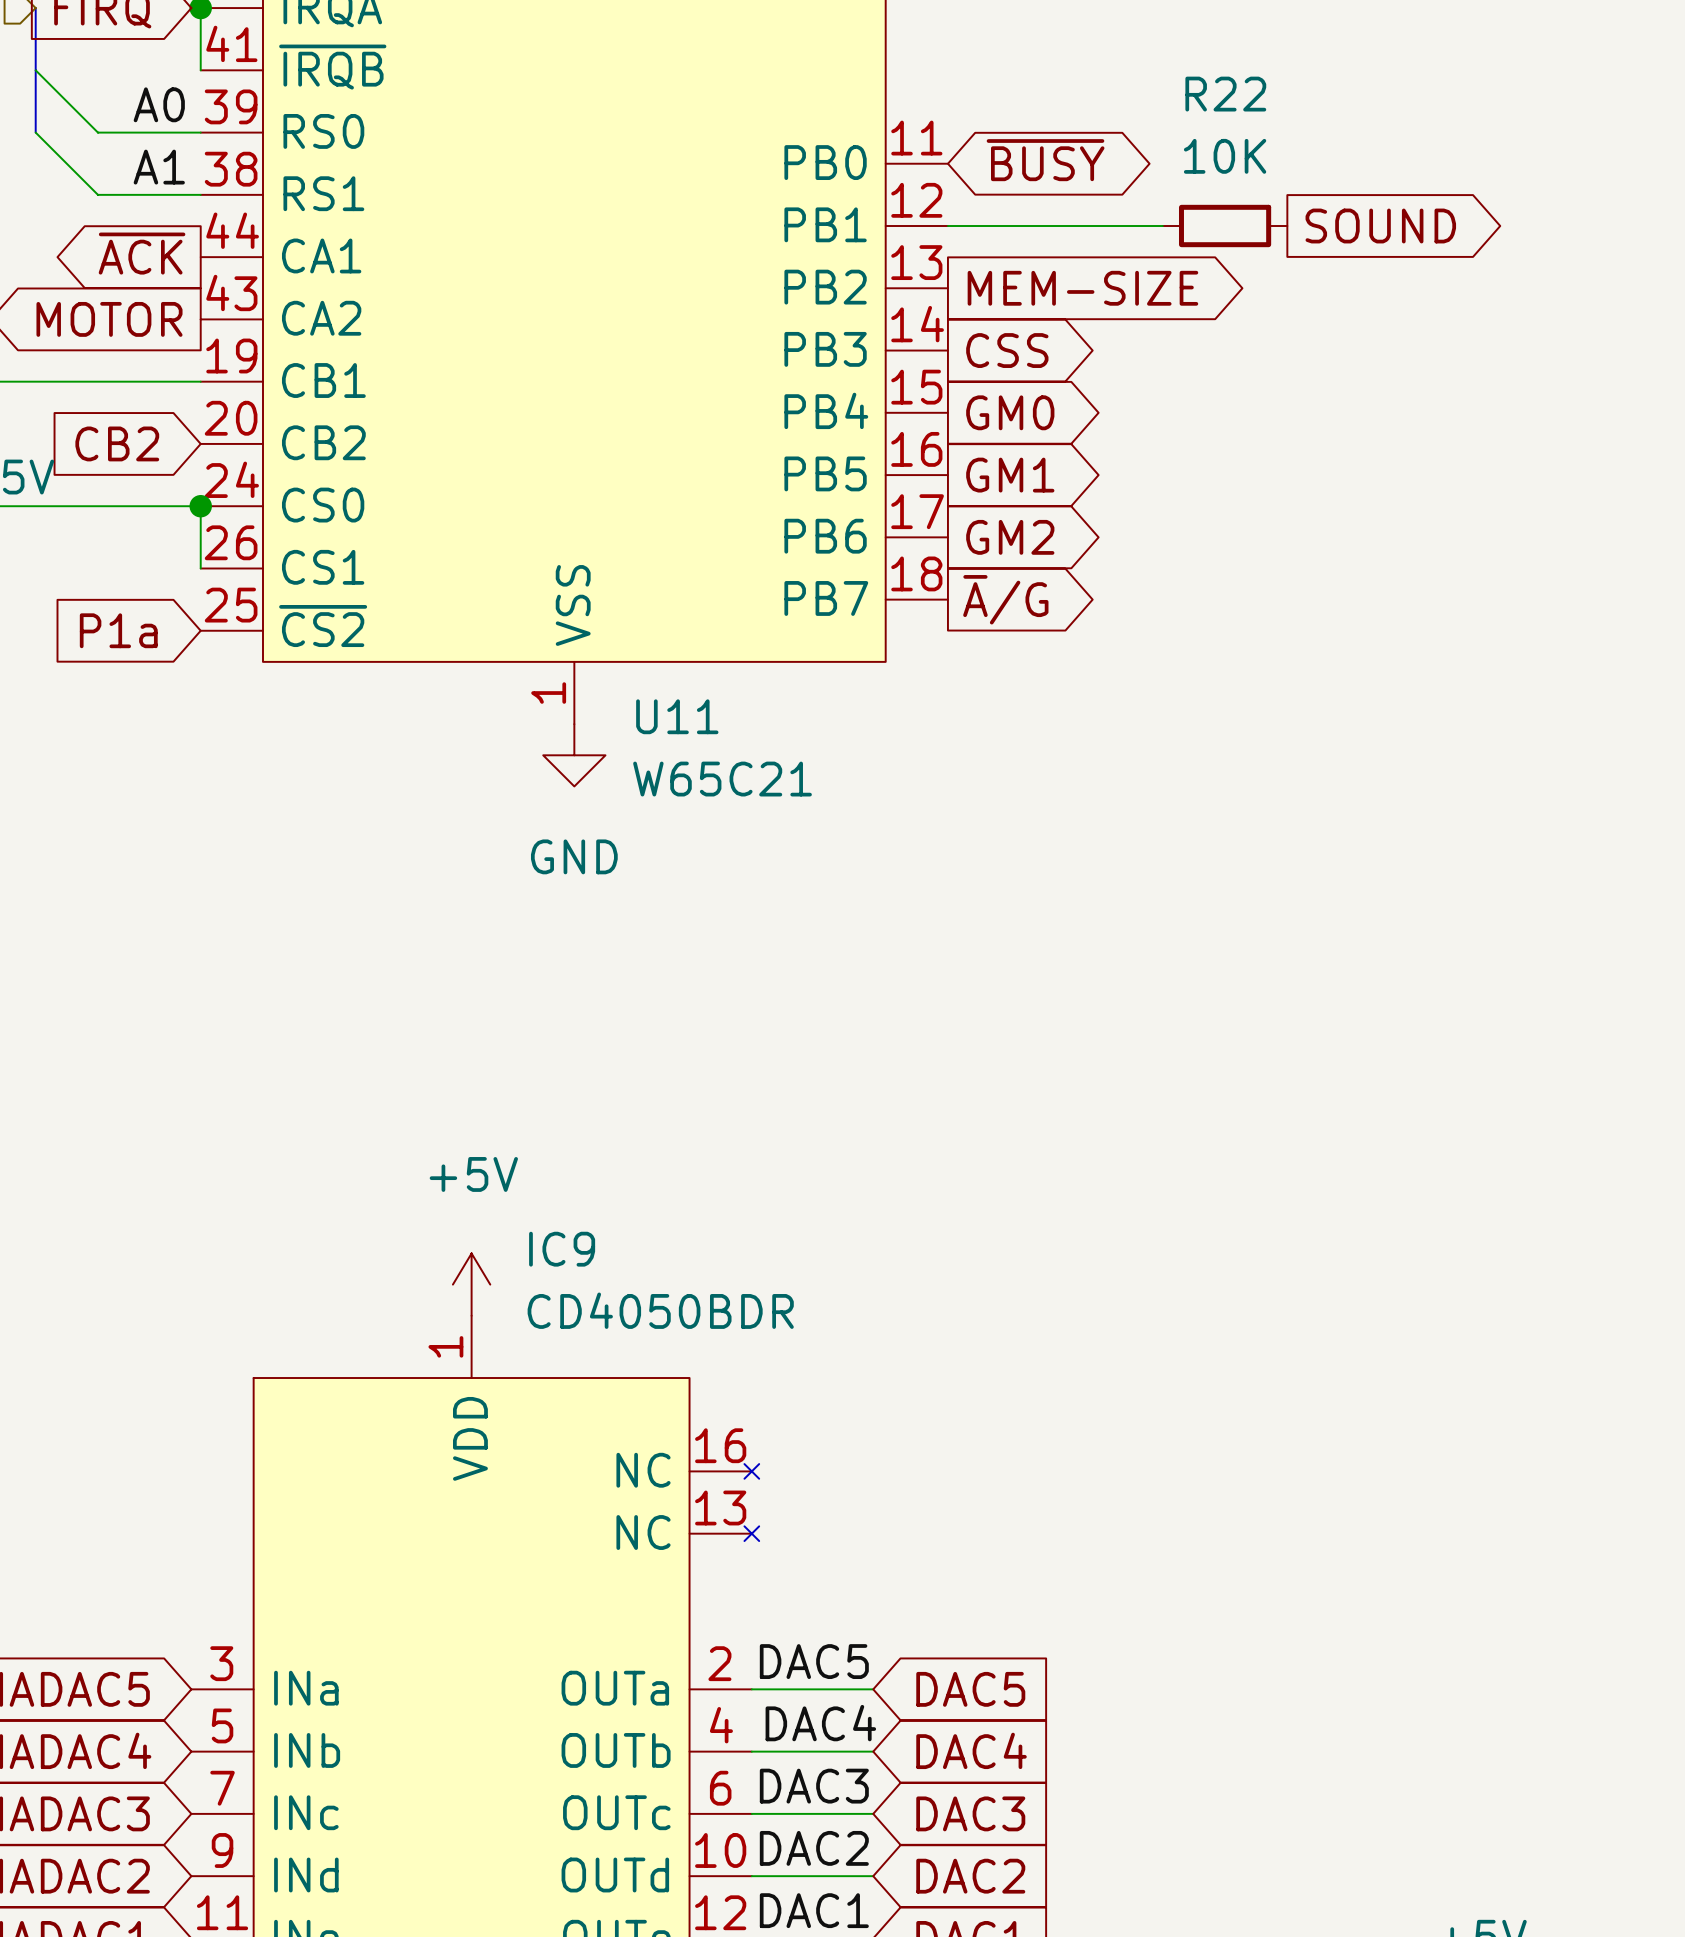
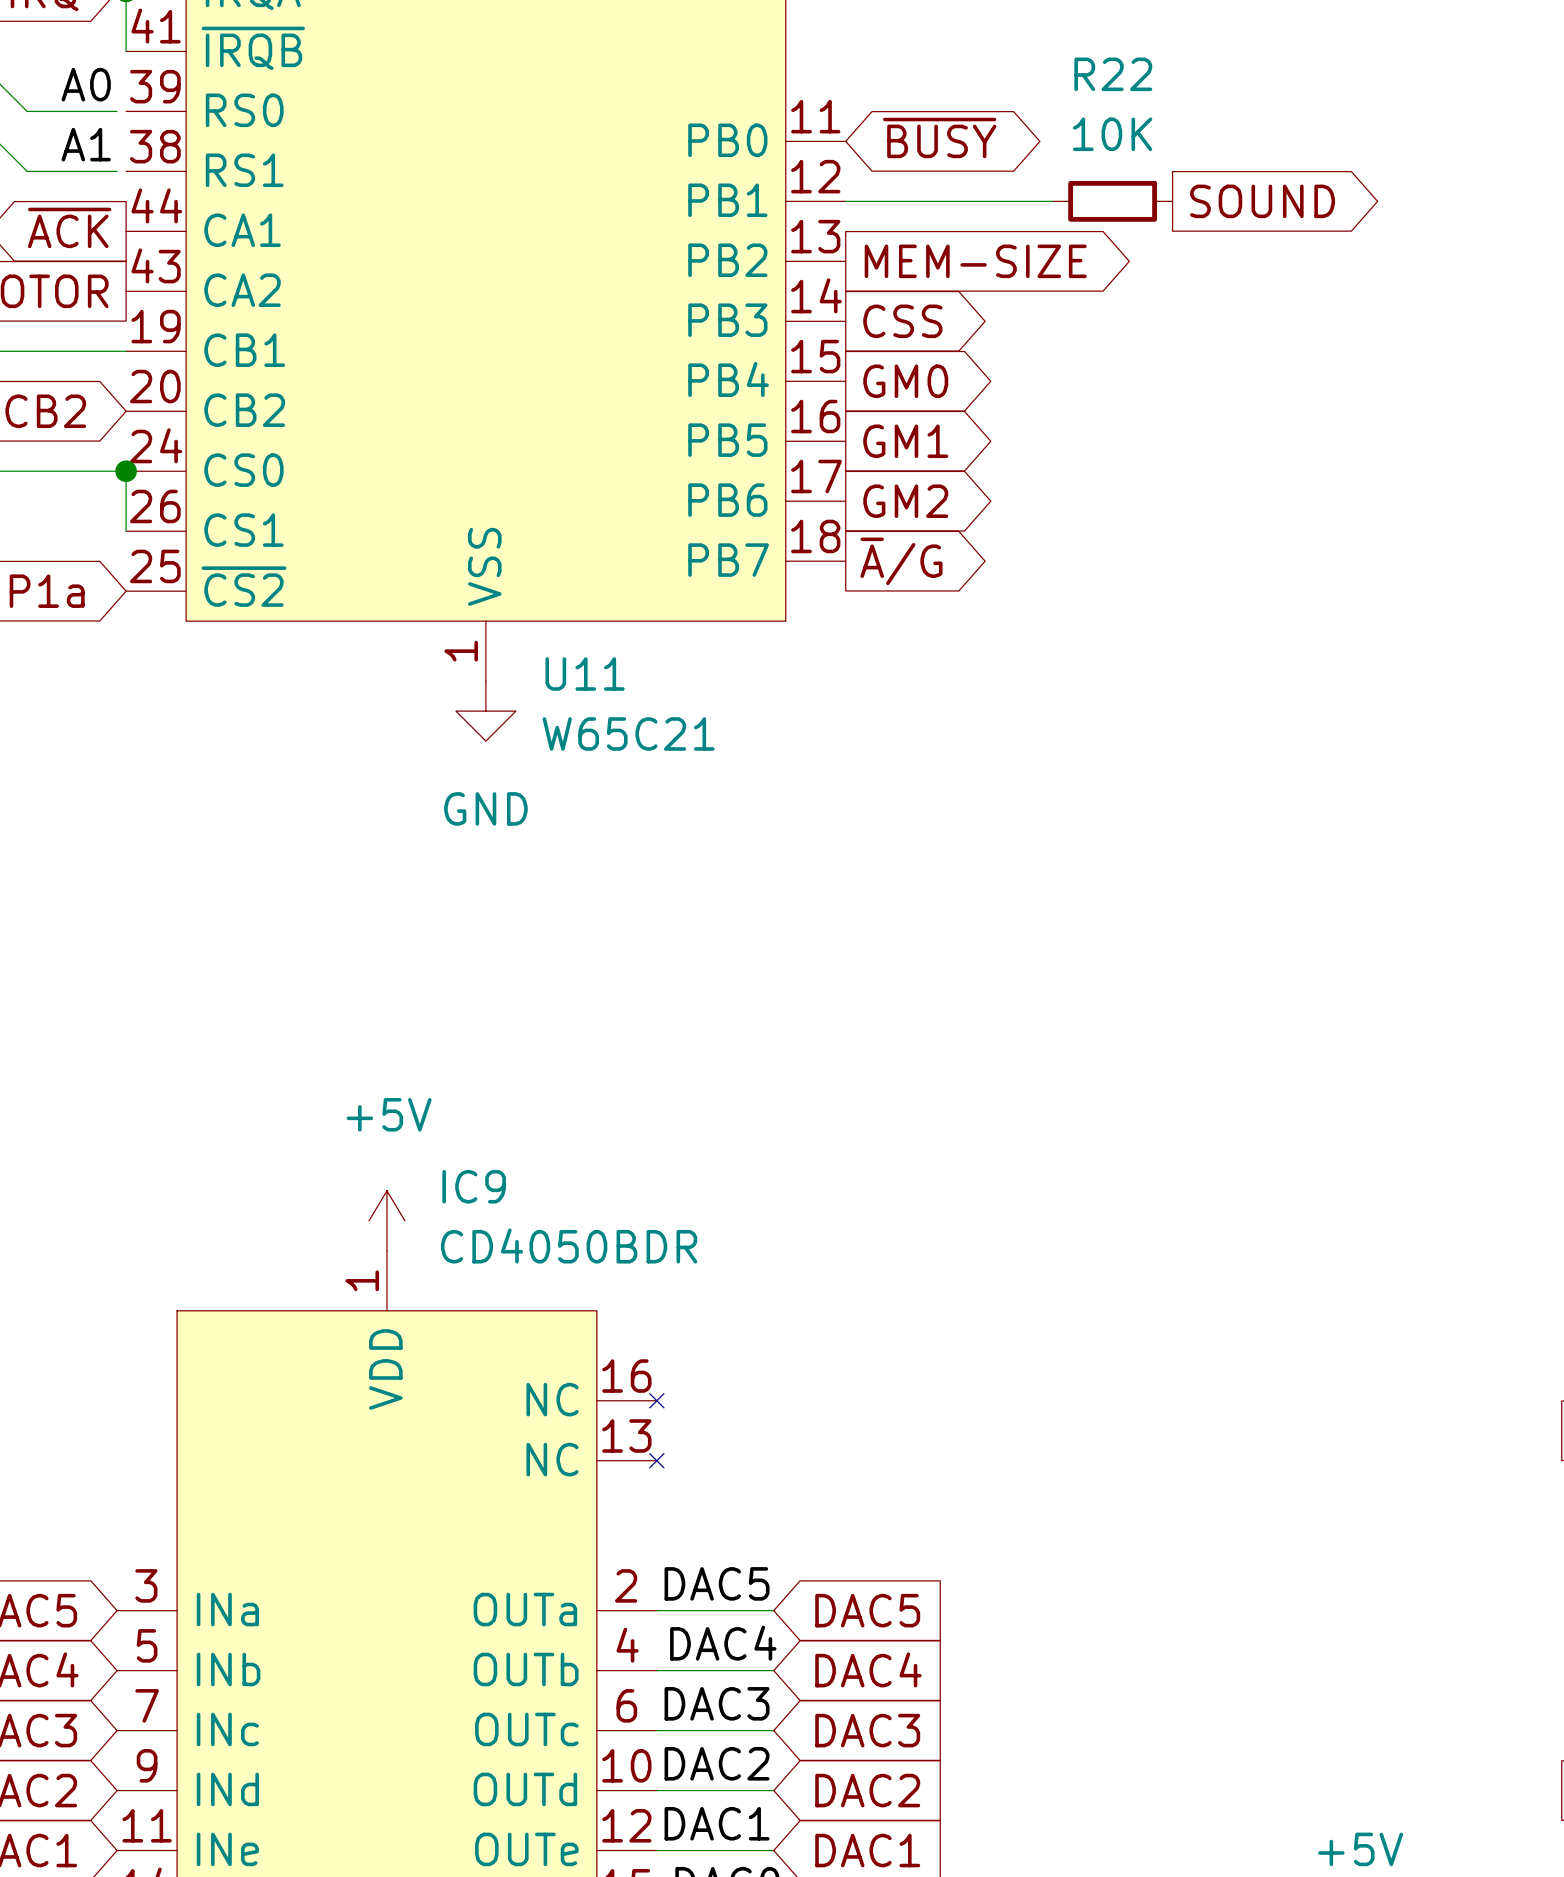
wire: (191, 132) (200, 132) -> none
wire: (191, 194) (200, 194) -> none

